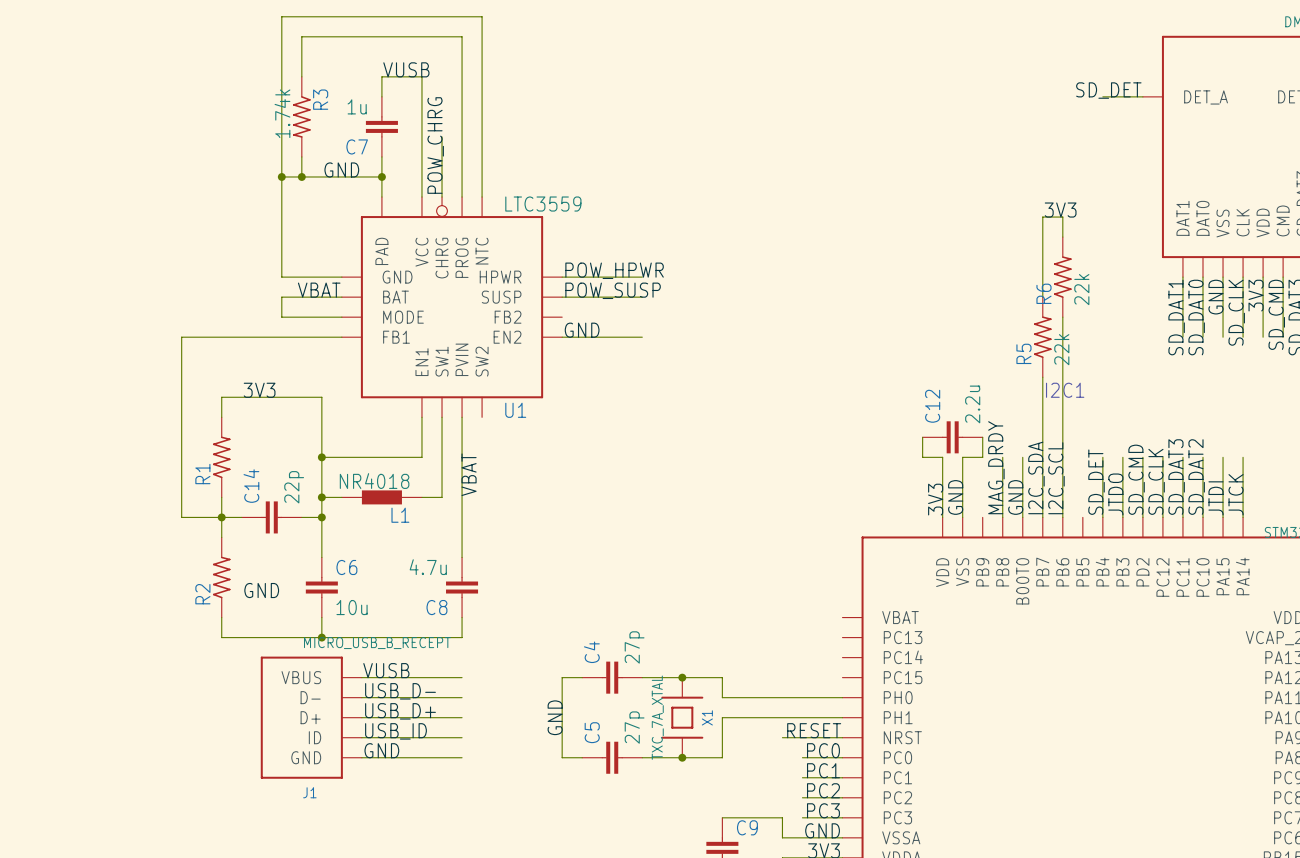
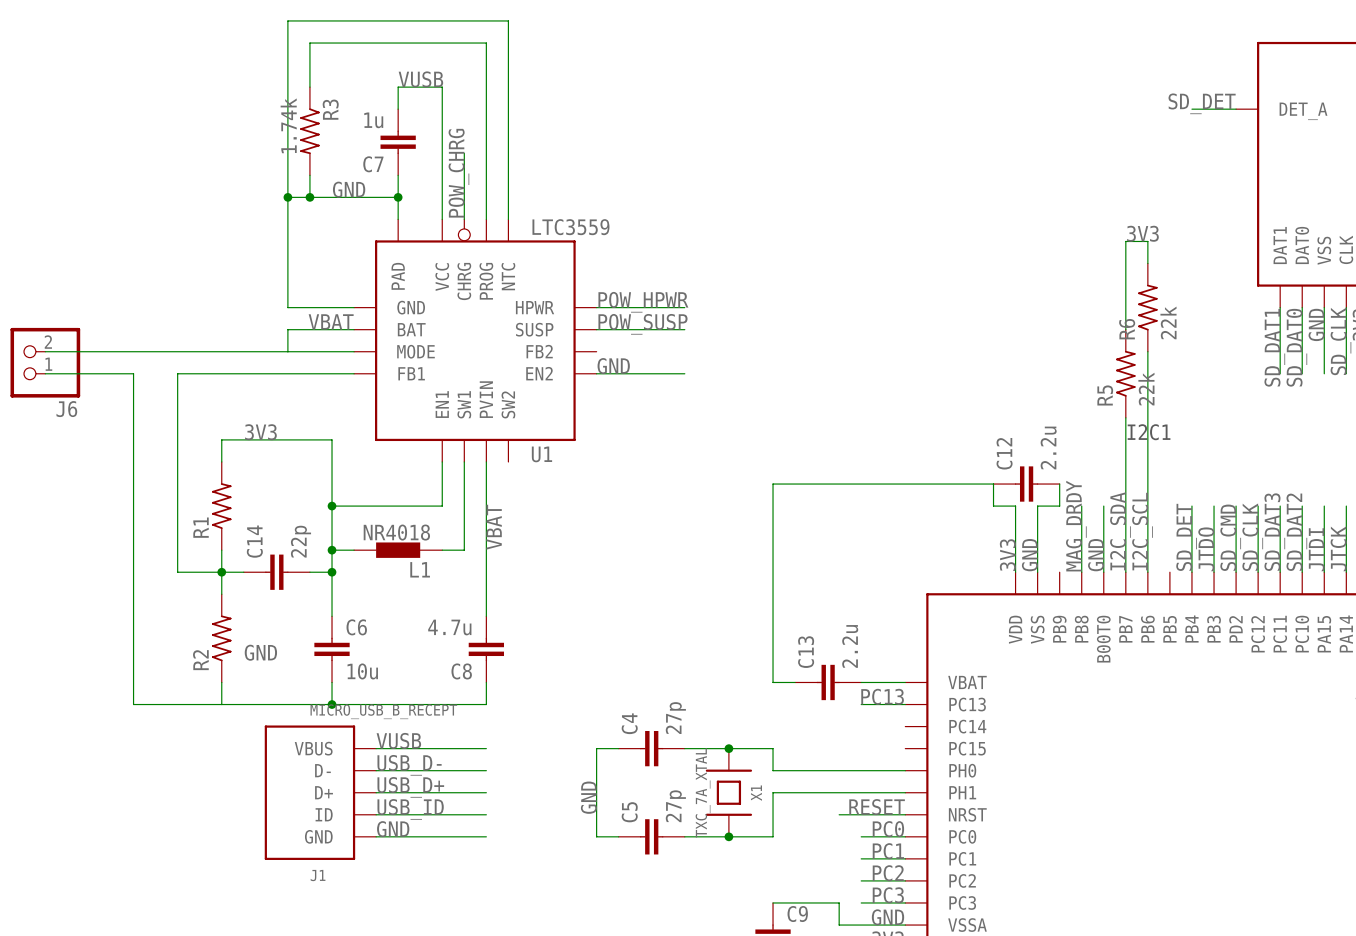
wire: none -> (45, 351) (287, 351)
J6: none -> (45, 362)
wire: none -> (45, 373) (133, 373) (133, 704) (221, 704)
wire: none -> (993, 484) (773, 484) (773, 682) (795, 682)
C13: none -> 2.2u (828, 682)
wire: none -> (861, 682) (905, 682)
label: none -> PC13 (882, 696)
wire: none -> (861, 704) (905, 704)

